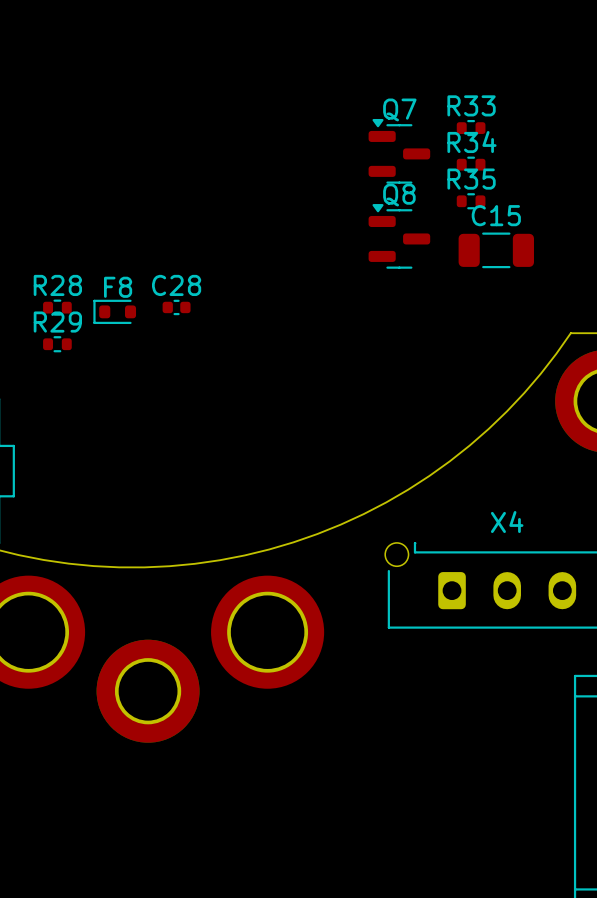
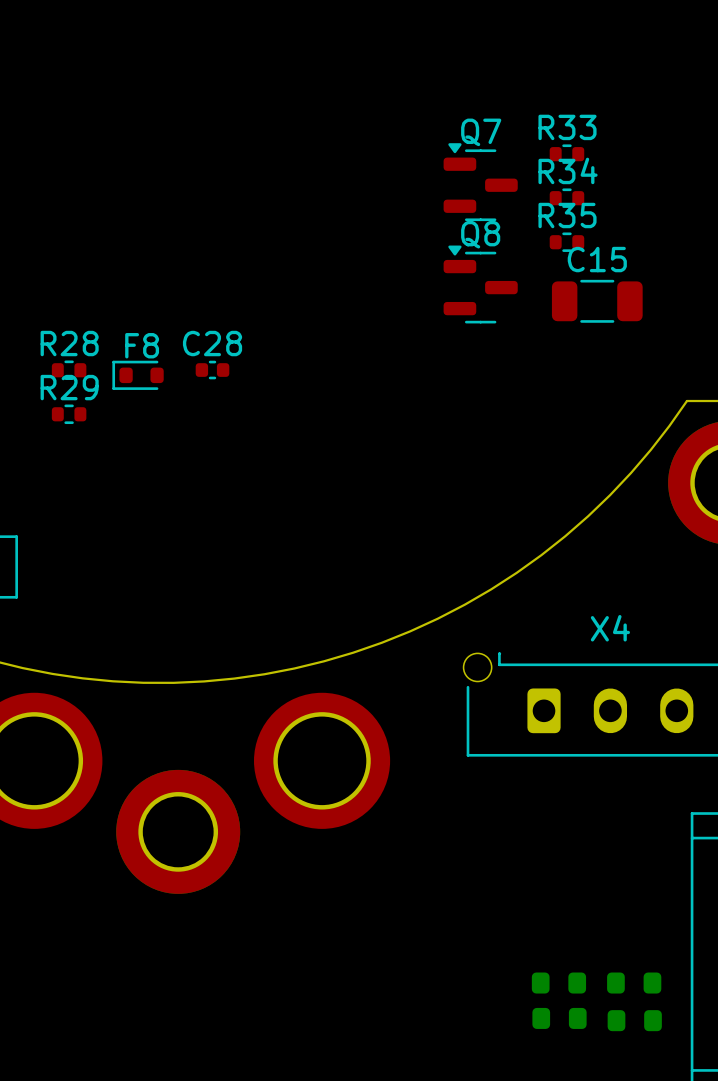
part: none -> (558, 983)
part: none -> (634, 983)
part: none -> (559, 1018)
part: none -> (634, 1020)

